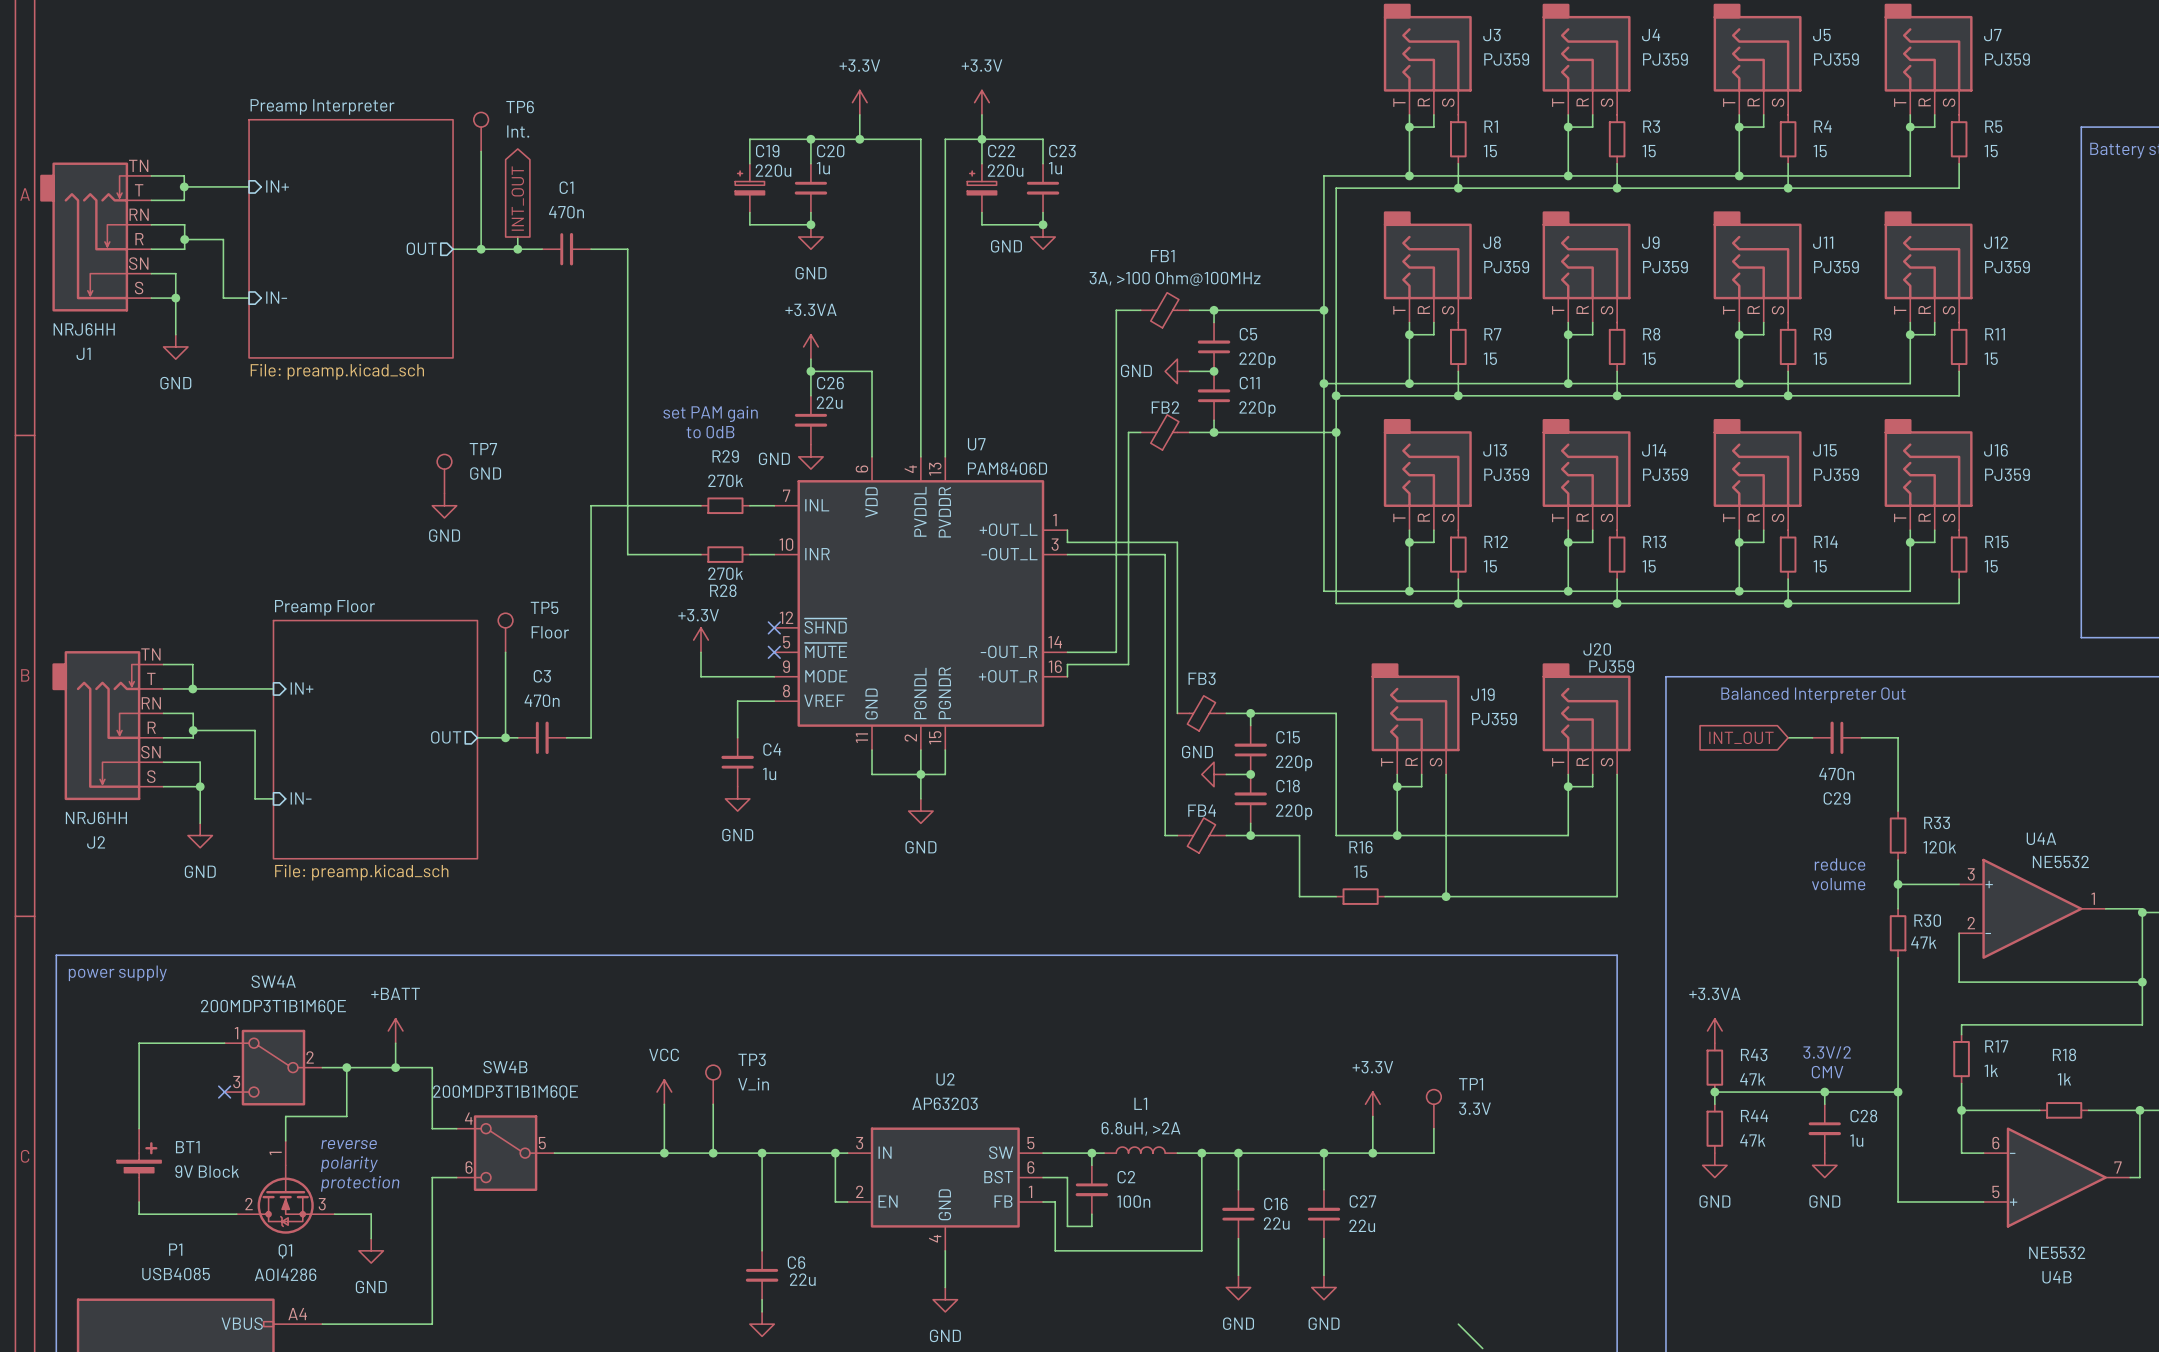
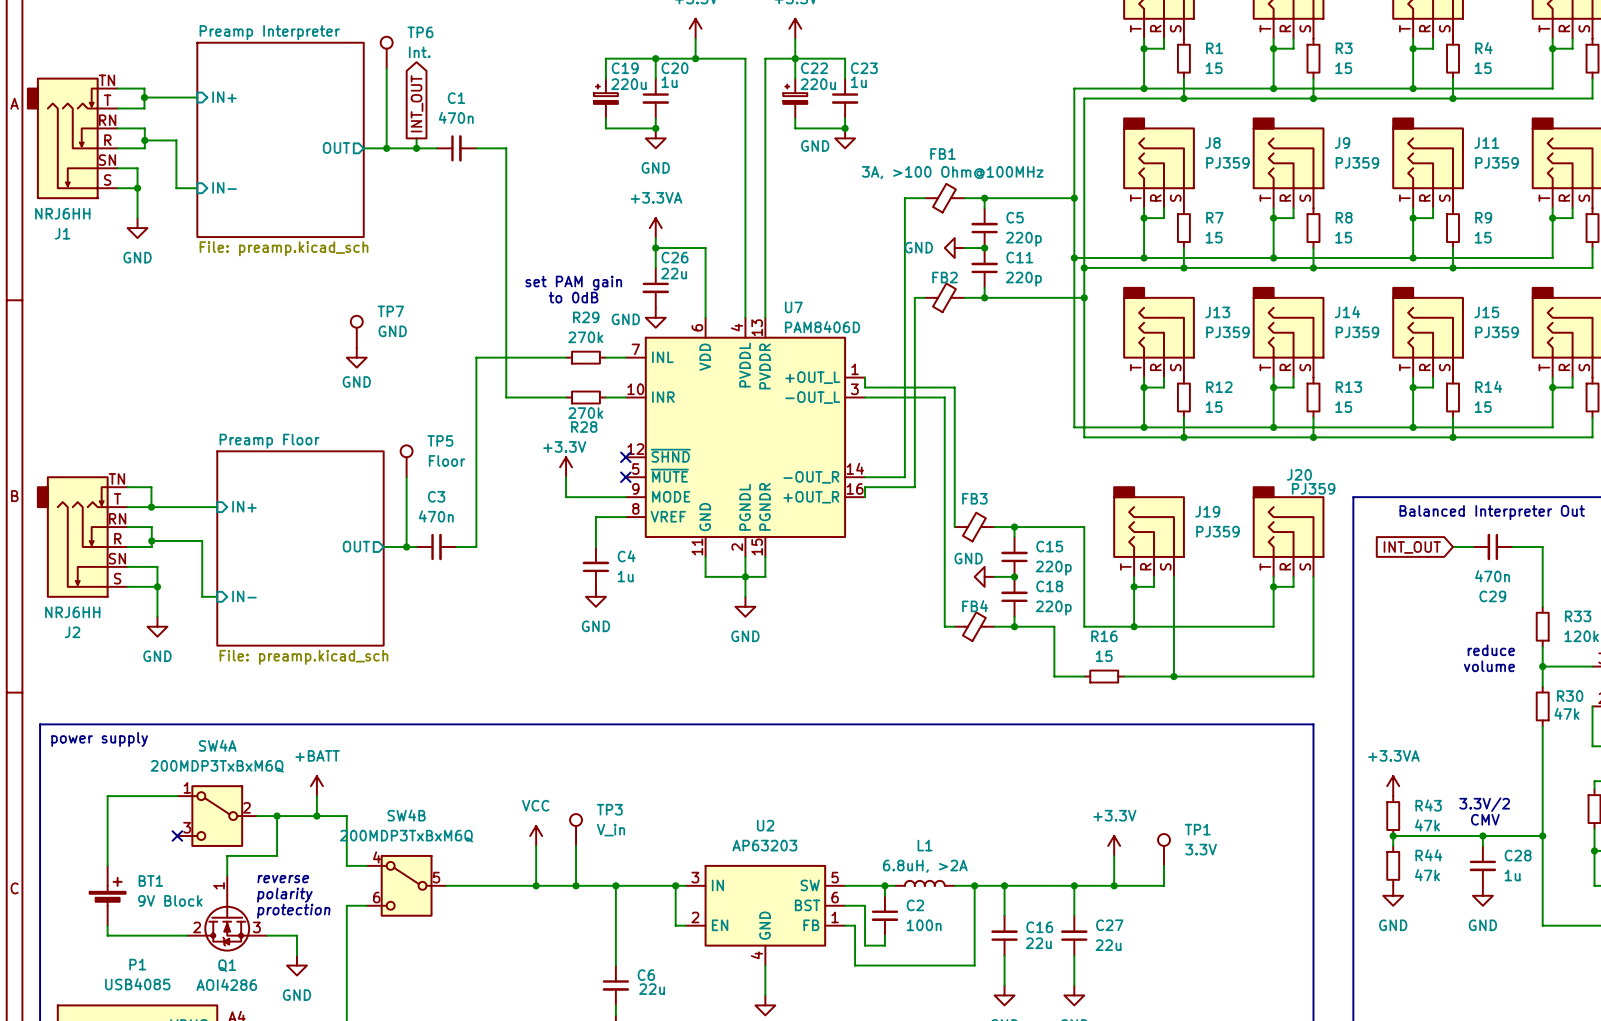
SW4A value: 200MDP3T1B1M6QE (273, 1007) -> 200MDP3TxBxM6Q (217, 766)
SW4B value: 200MDP3T1B1M6QE (505, 1092) -> 200MDP3TxBxM6Q (406, 836)

